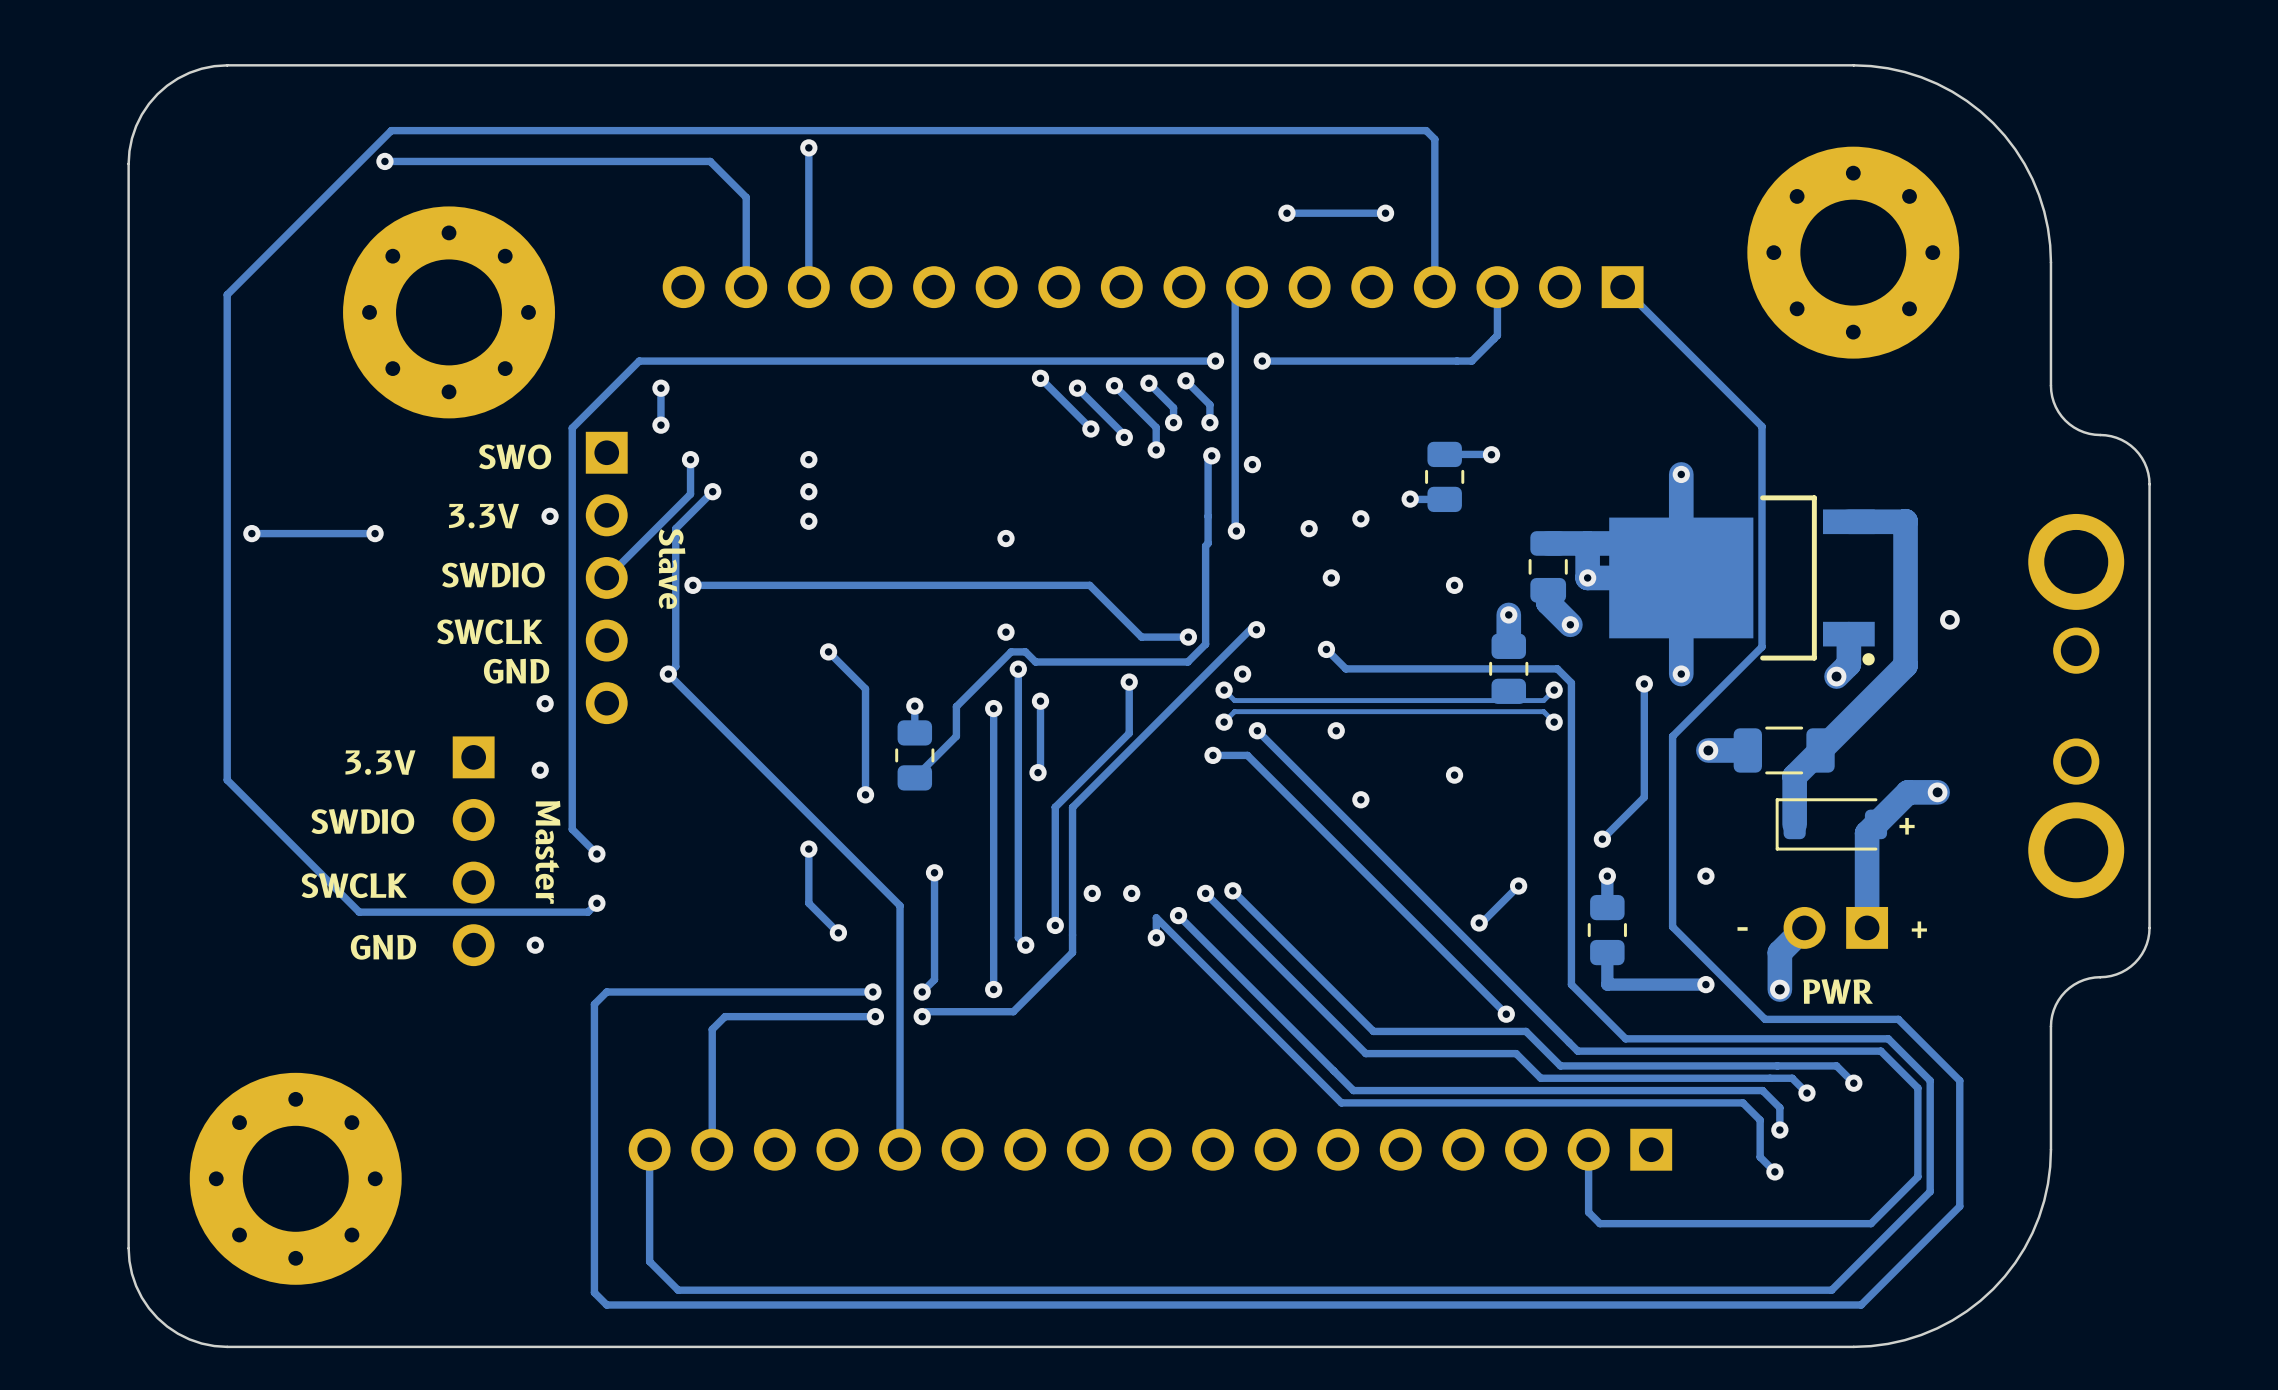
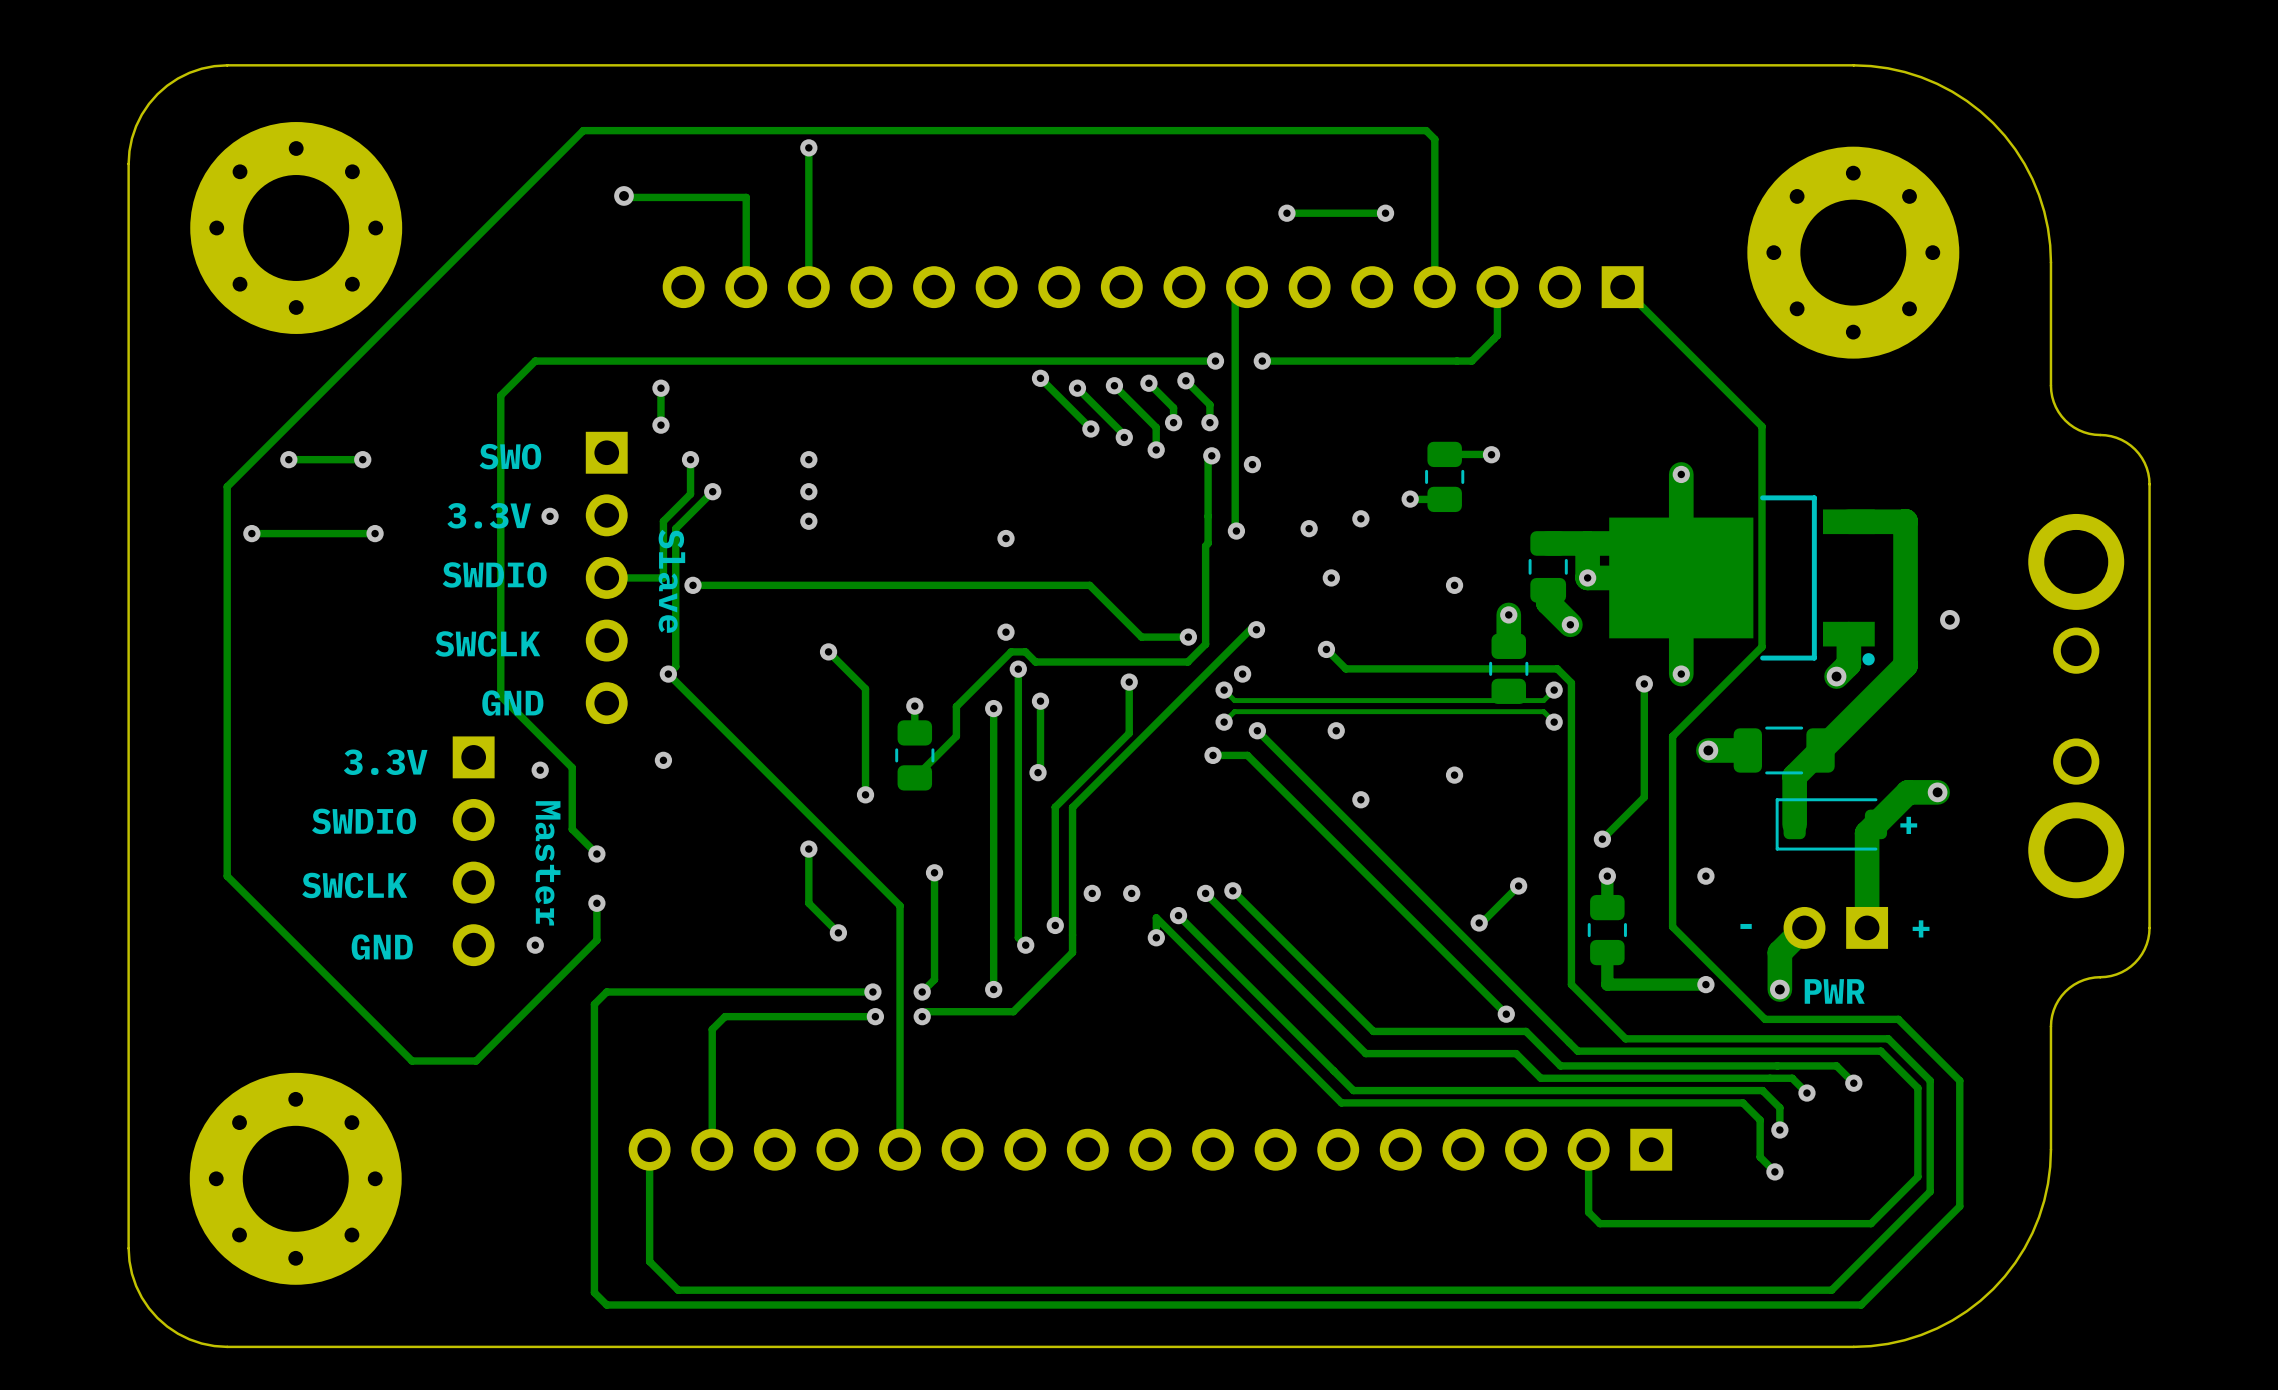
track: (583, 130) (391, 130) (227, 294) (227, 486) -> (583, 130) (227, 486)
track: (384, 161) (710, 161) (746, 197) -> (623, 195) (746, 197)
via: (384, 161) -> none
via: none -> (623, 195)
part position: (449, 312) -> (296, 227)
track: (639, 361) (572, 428) (572, 767) -> (639, 361) (535, 361) (500, 395) (500, 696) (572, 767)
via: none -> (288, 459)
track: none -> (362, 459) (288, 459)
via: none -> (362, 459)
track: (663, 521) (606, 577) -> (663, 521) (663, 577) (606, 577)
text position: SWCLK (489, 631) -> SWCLK (487, 643)
text position: GND (516, 671) -> GND (512, 703)
via position: (545, 703) -> (663, 760)
track: (227, 780) (359, 912) (588, 912) (596, 903) -> (227, 780) (227, 876) (412, 1061) (476, 1061) (596, 940) (596, 903)

